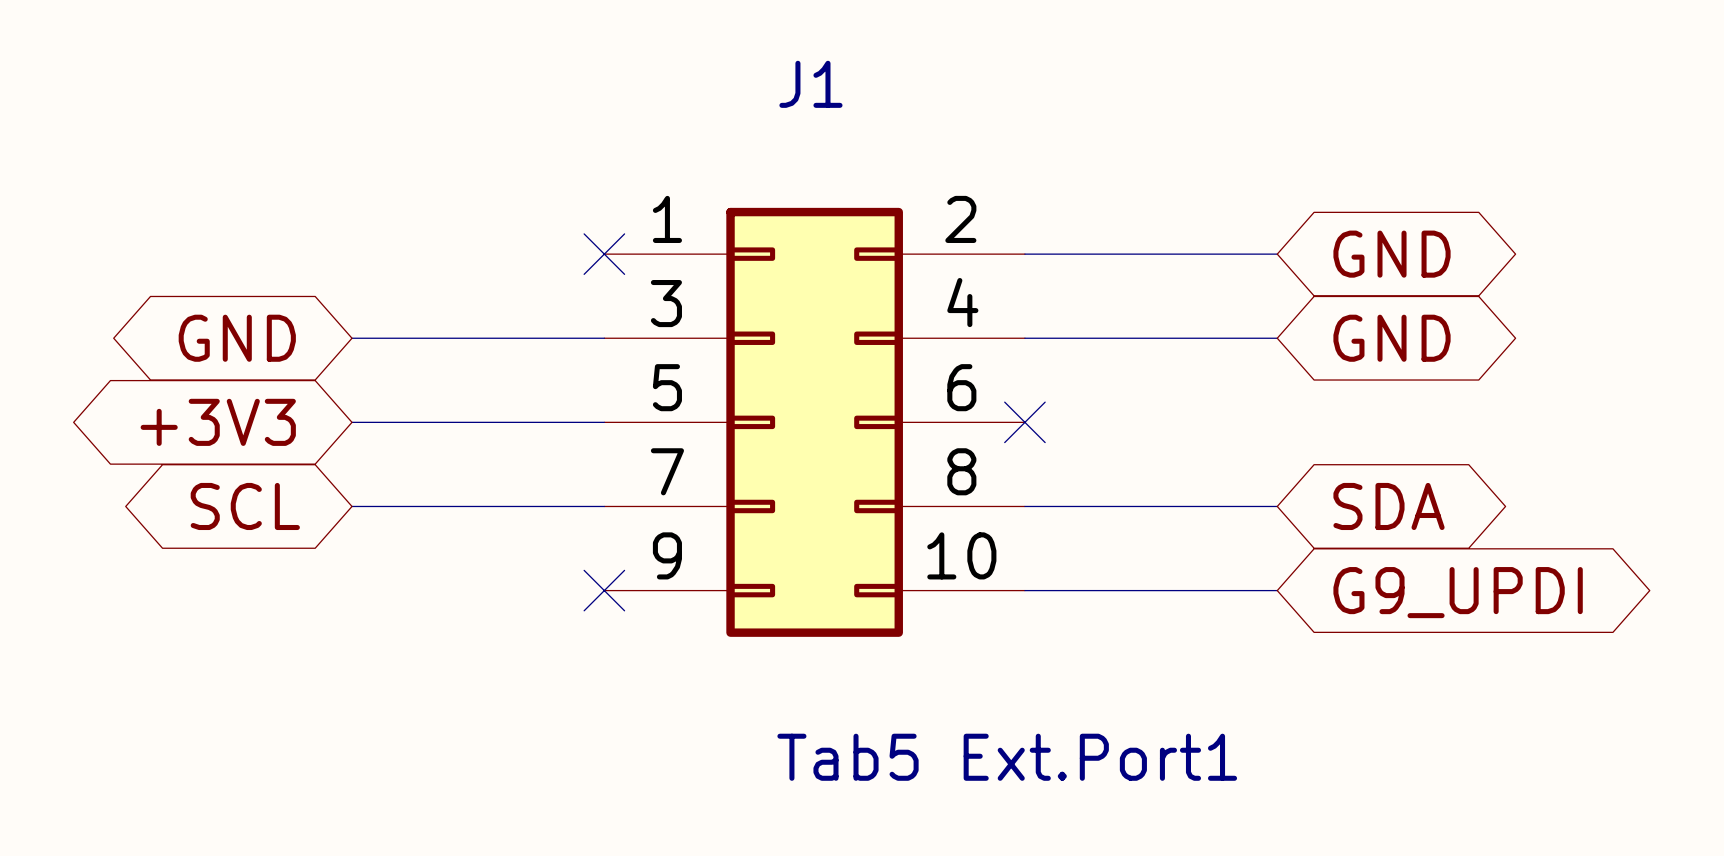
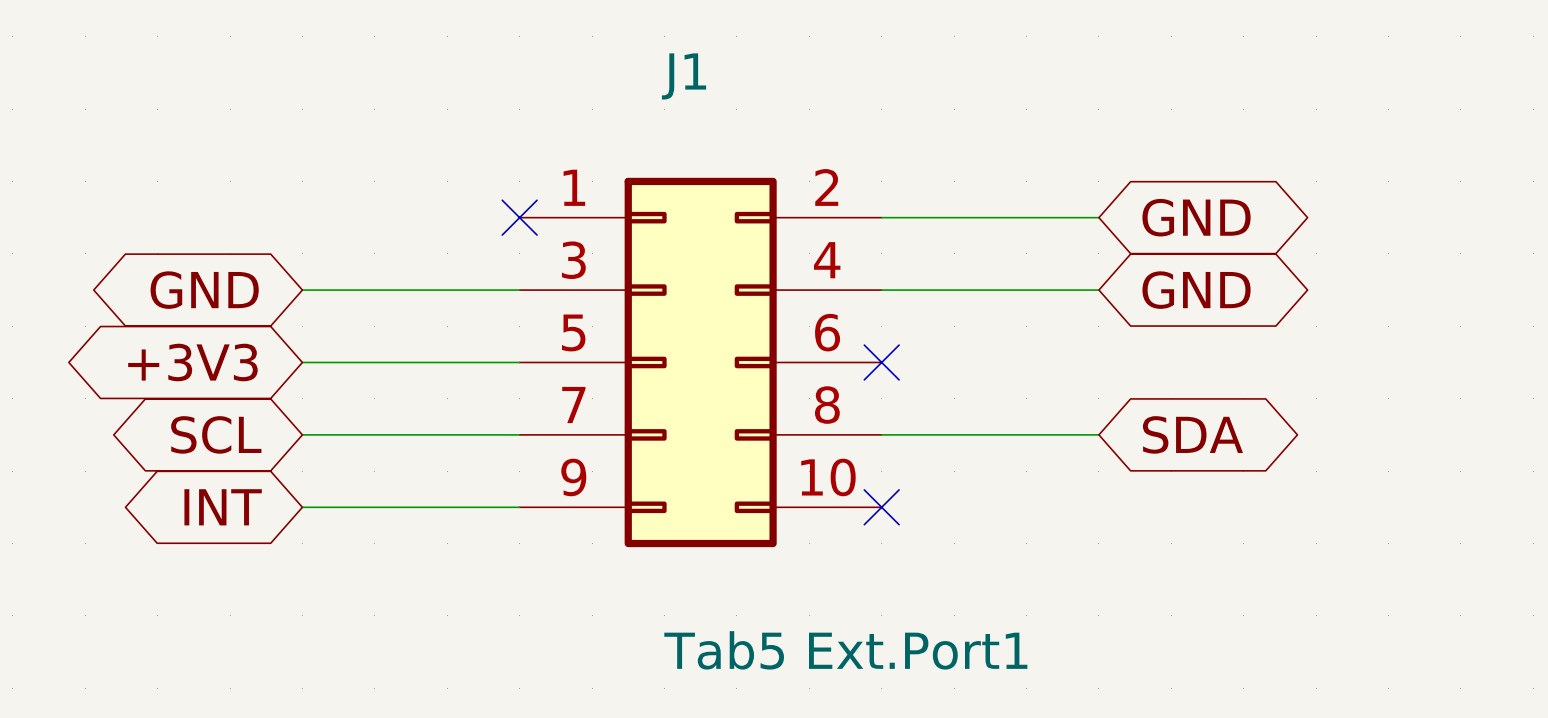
global label: none -> INT (223, 507)
no-connect mark: (604, 590) -> none
wire: (1024, 590) (1277, 590) -> (302, 507) (519, 507)
no-connect mark: none -> (881, 507)
global label: G9_UPDI (1458, 592) -> none

